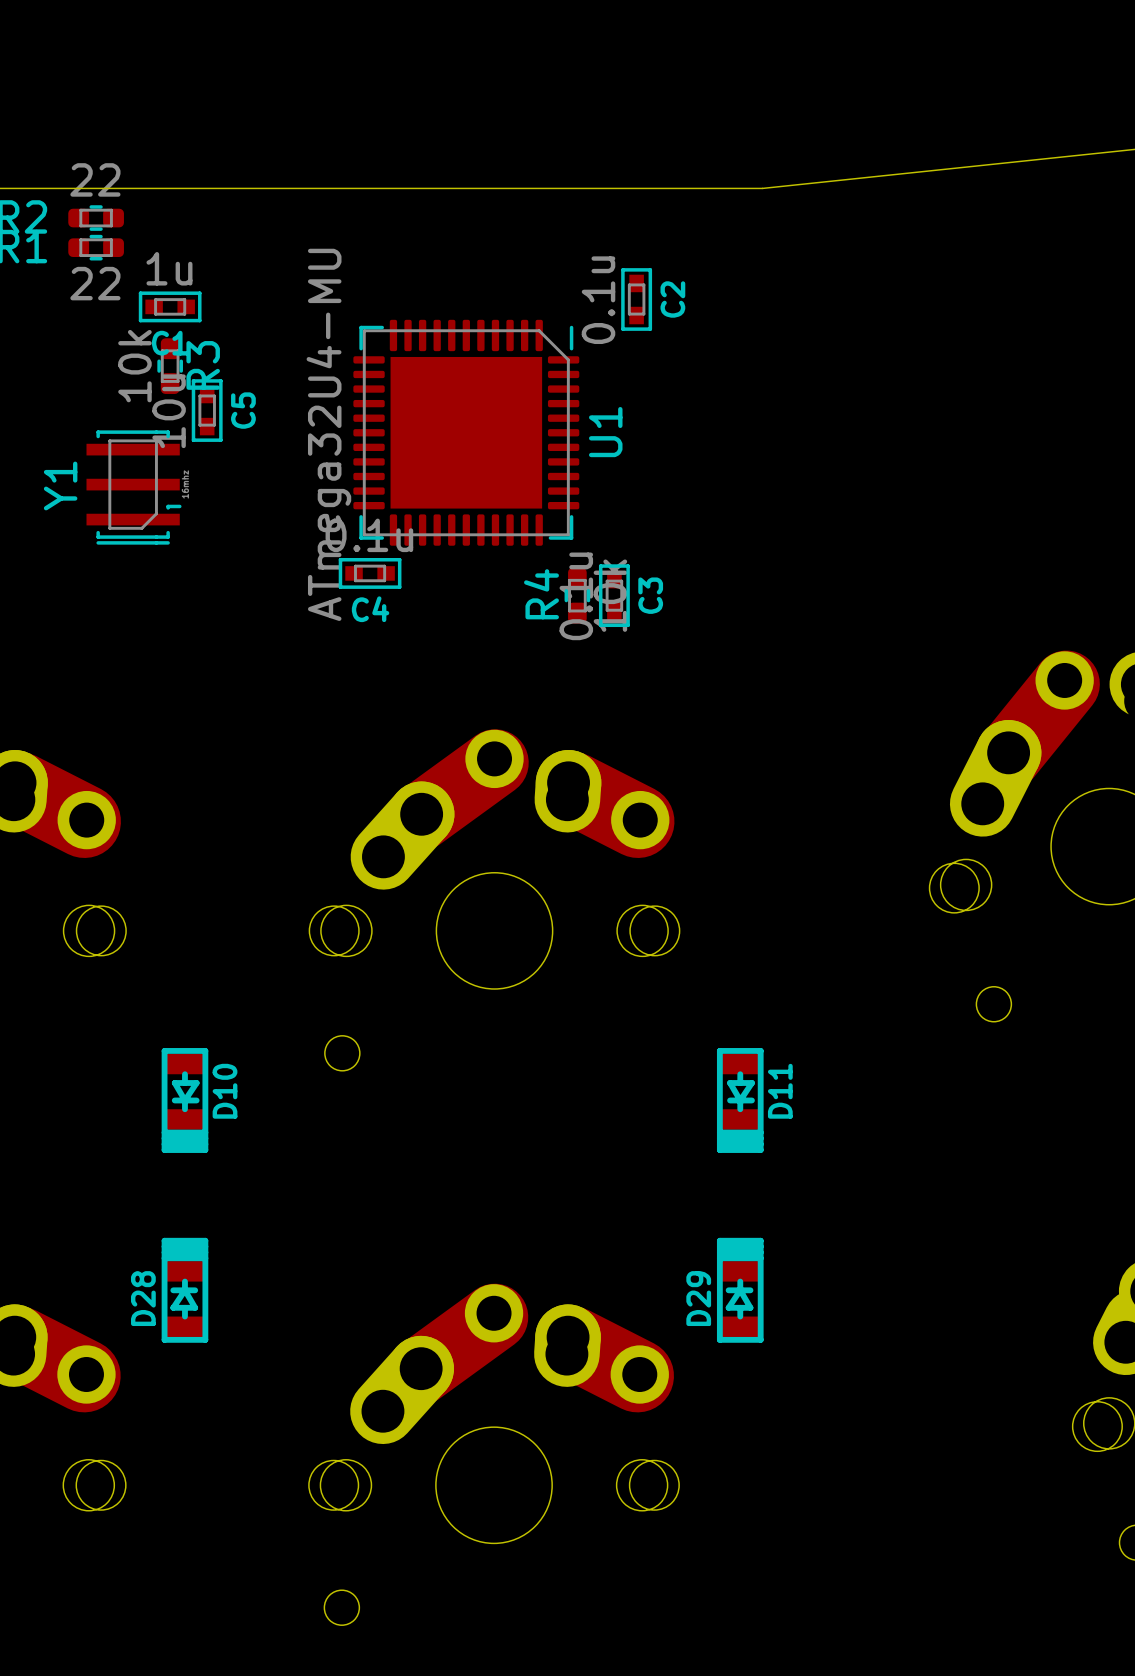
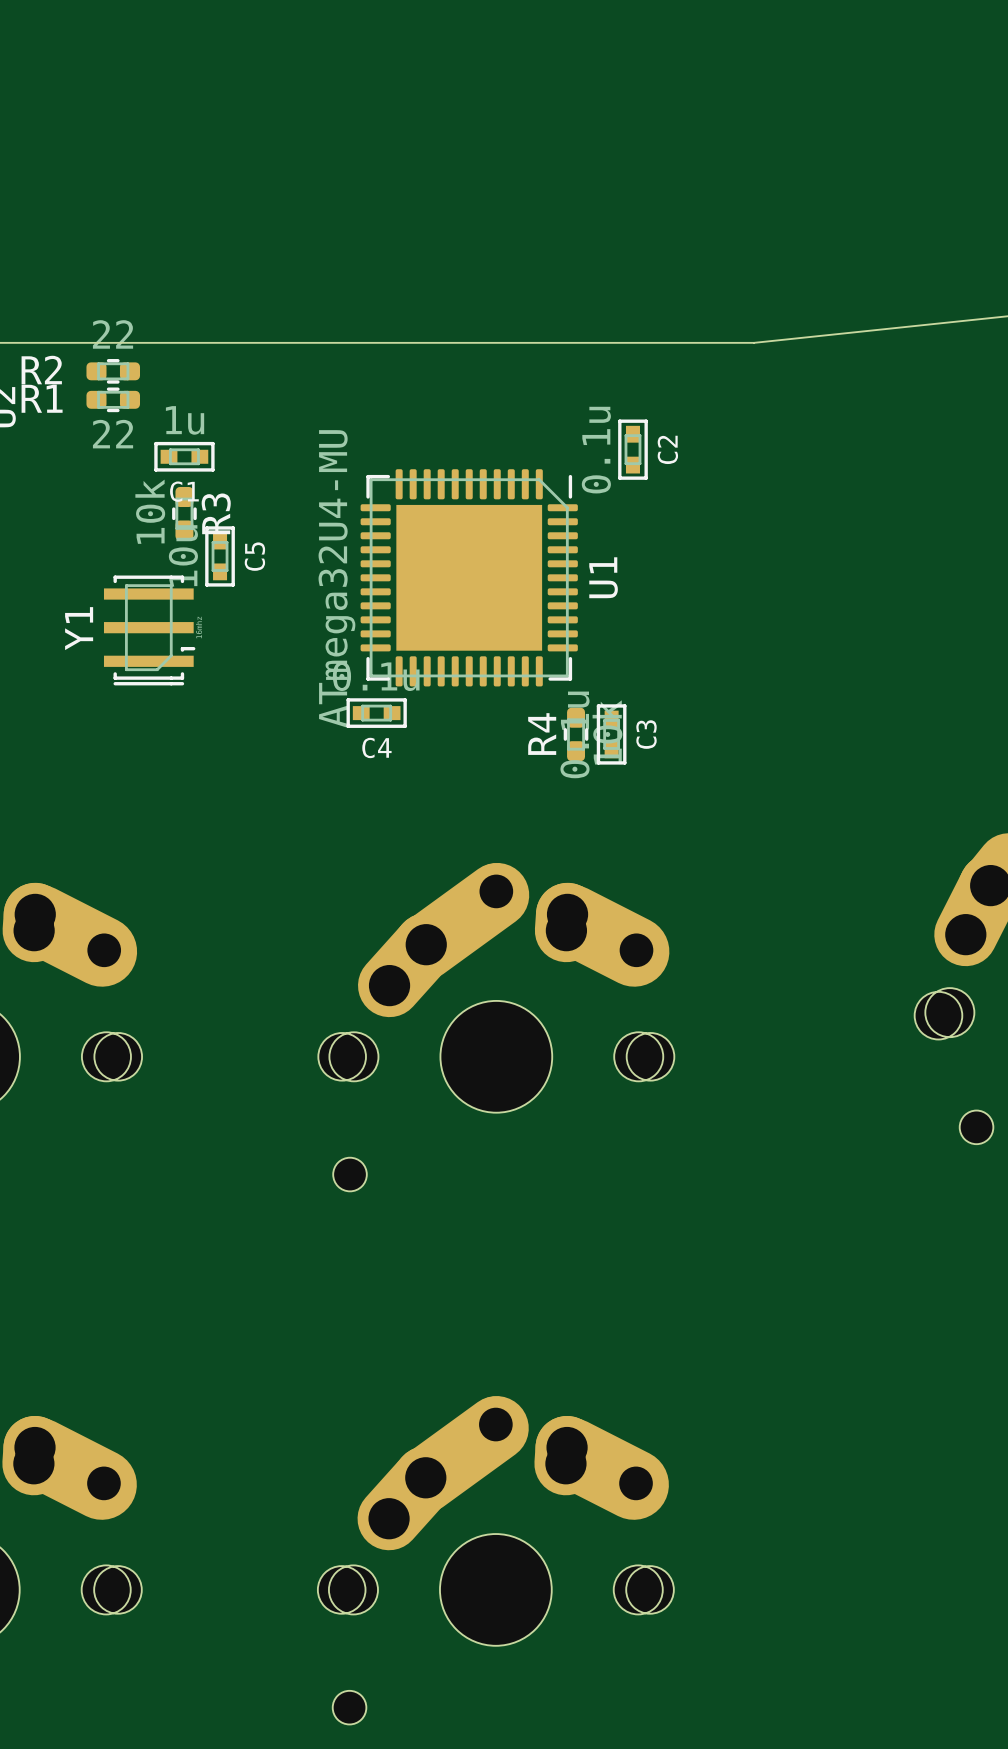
D10: (184, 1100) -> none
D11: (740, 1100) -> none
D28: (184, 1290) -> none
D29: (740, 1290) -> none

